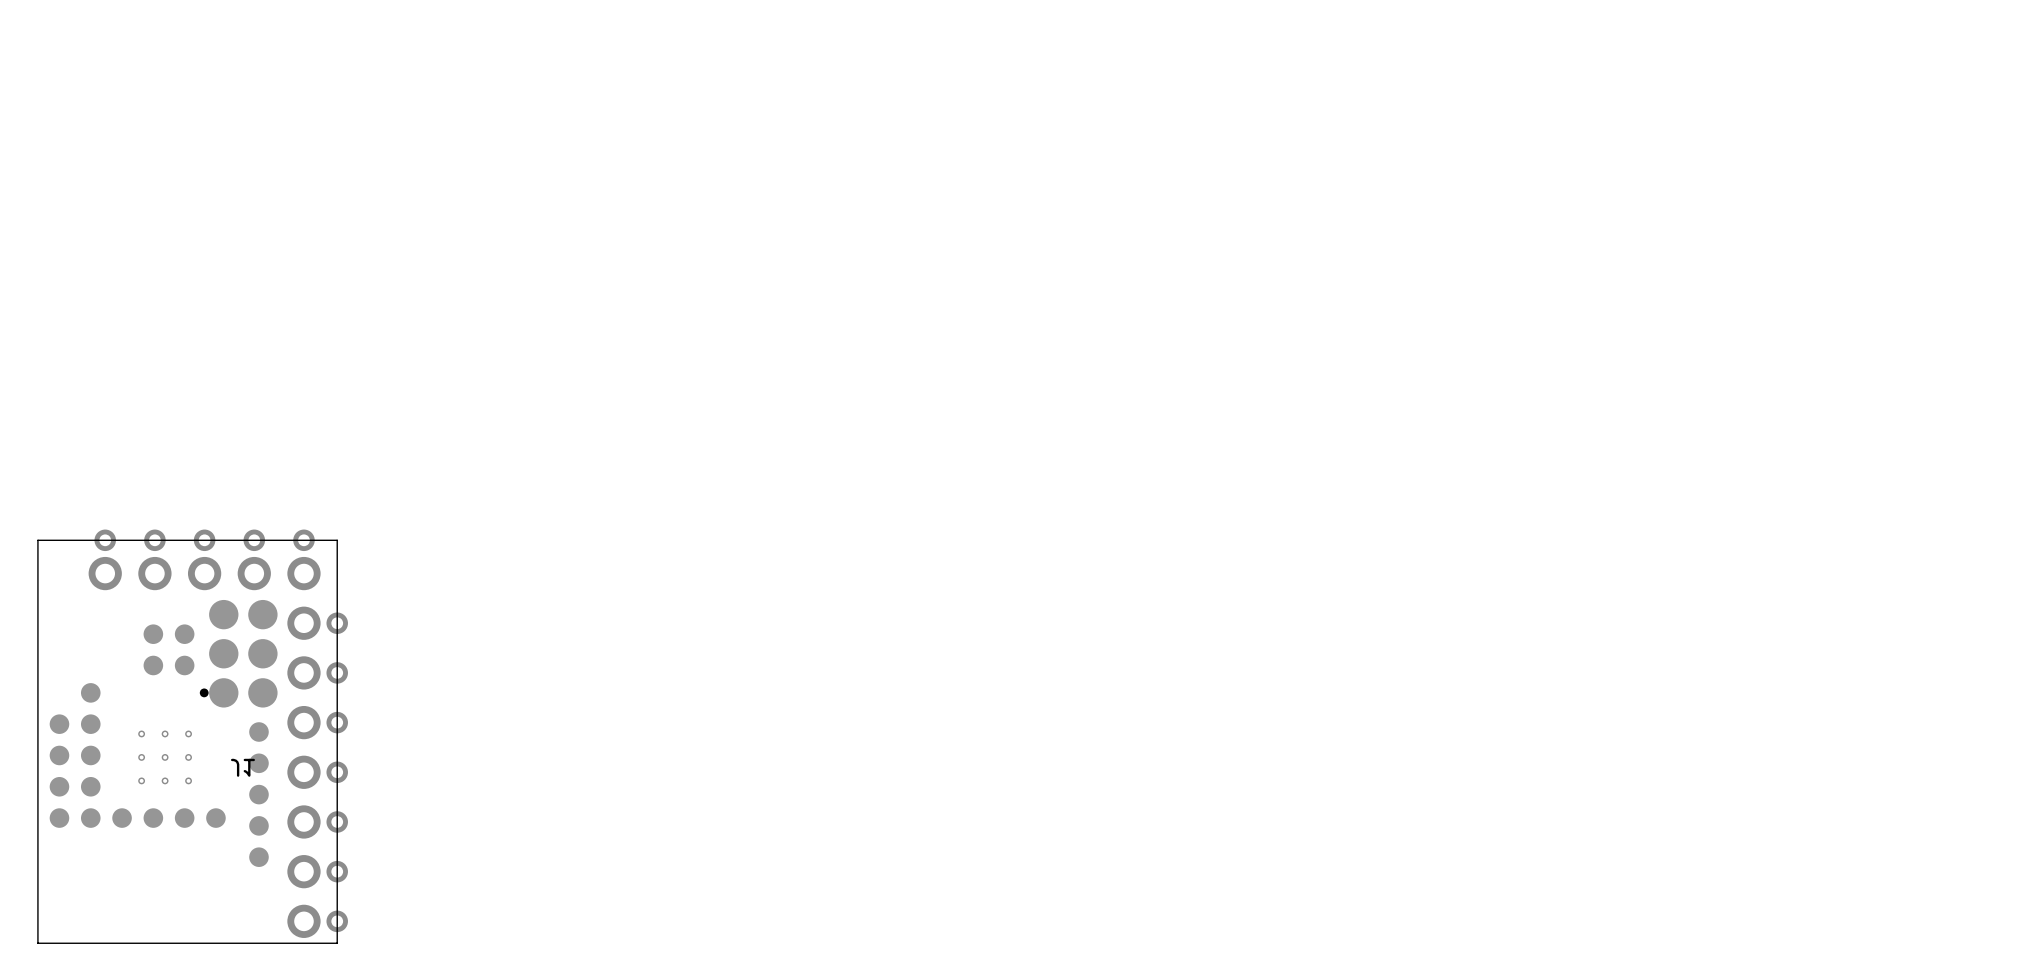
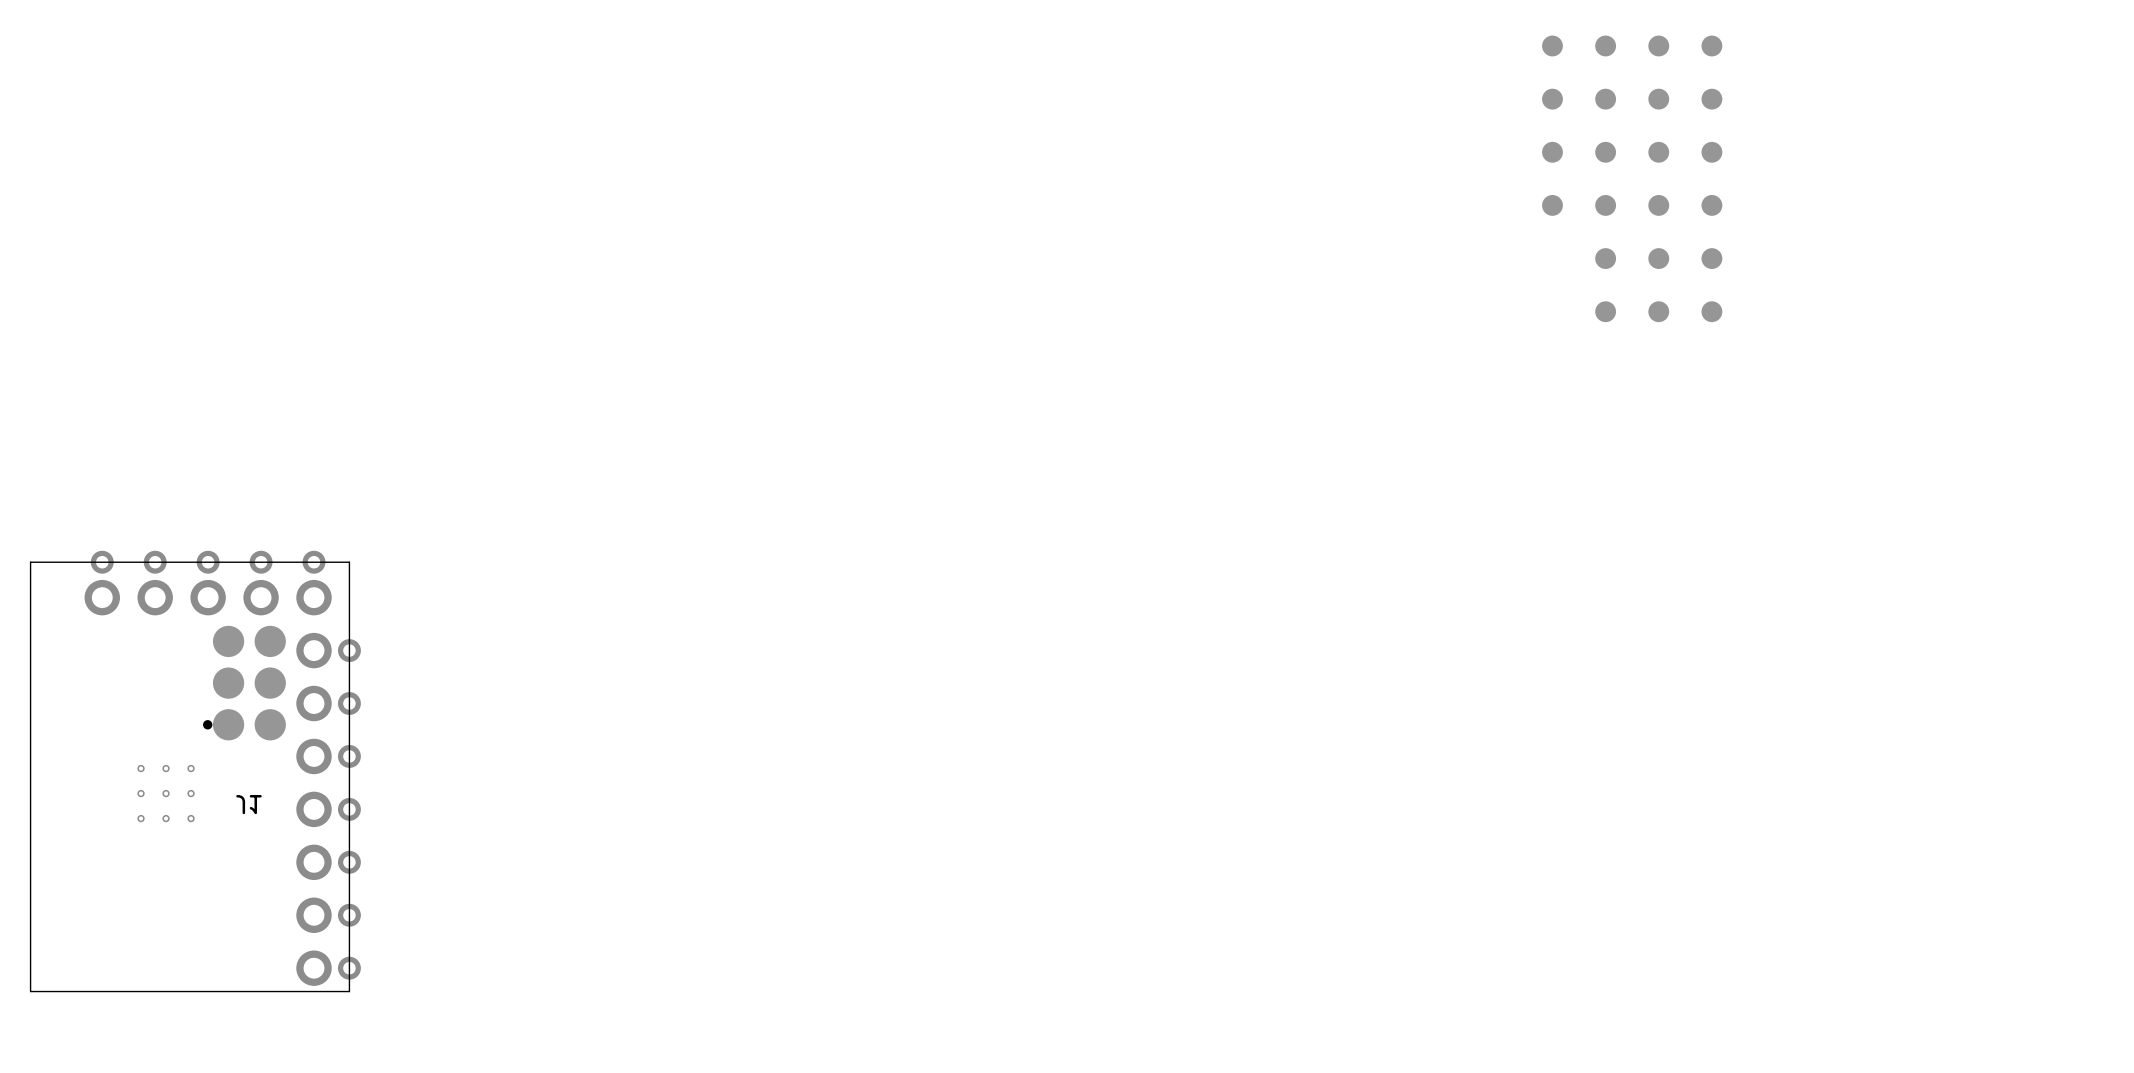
part: none -> (1552, 45)
part: none -> (1605, 45)
part: none -> (1658, 45)
part: none -> (1711, 45)
part: none -> (1552, 99)
part: none -> (1605, 99)
part: none -> (1658, 99)
part: none -> (1711, 99)
part: none -> (1552, 152)
part: none -> (1605, 152)
part: none -> (1658, 152)
part: none -> (1711, 152)
part: none -> (1552, 205)
part: none -> (1605, 205)
part: none -> (1658, 205)
part: none -> (1711, 205)
part: none -> (1605, 258)
part: none -> (1658, 258)
part: none -> (1711, 258)
part: none -> (1605, 311)
part: none -> (1658, 311)
part: none -> (1711, 311)
part: (153, 634) -> none
part: (184, 634) -> none
part: (153, 665) -> none
part: (184, 665) -> none
part: (90, 692) -> none
part: (59, 724) -> none
part: (90, 724) -> none
part: (258, 732) -> none
part: (59, 755) -> none
part: (90, 755) -> none
part: (258, 763) -> none
part: (59, 786) -> none
part: (90, 786) -> none
part: (258, 794) -> none
part: (59, 818) -> none
part: (90, 818) -> none
part: (122, 818) -> none
part: (153, 818) -> none
part: (184, 818) -> none
part: (215, 818) -> none
part: (258, 825) -> none
part: (258, 857) -> none

